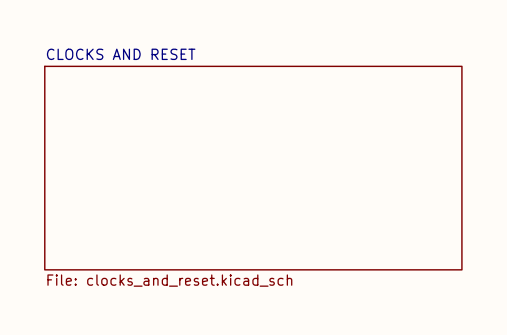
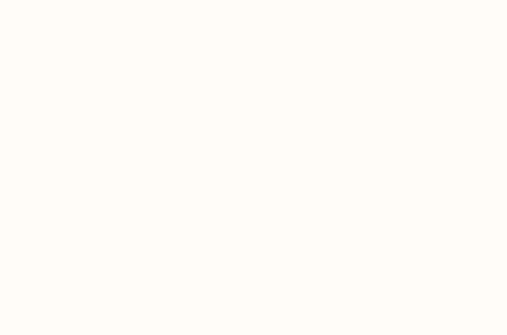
sheet CLOCKS AND RESET: File: clocks_and_reset.kicad_sch (253, 168) -> none

